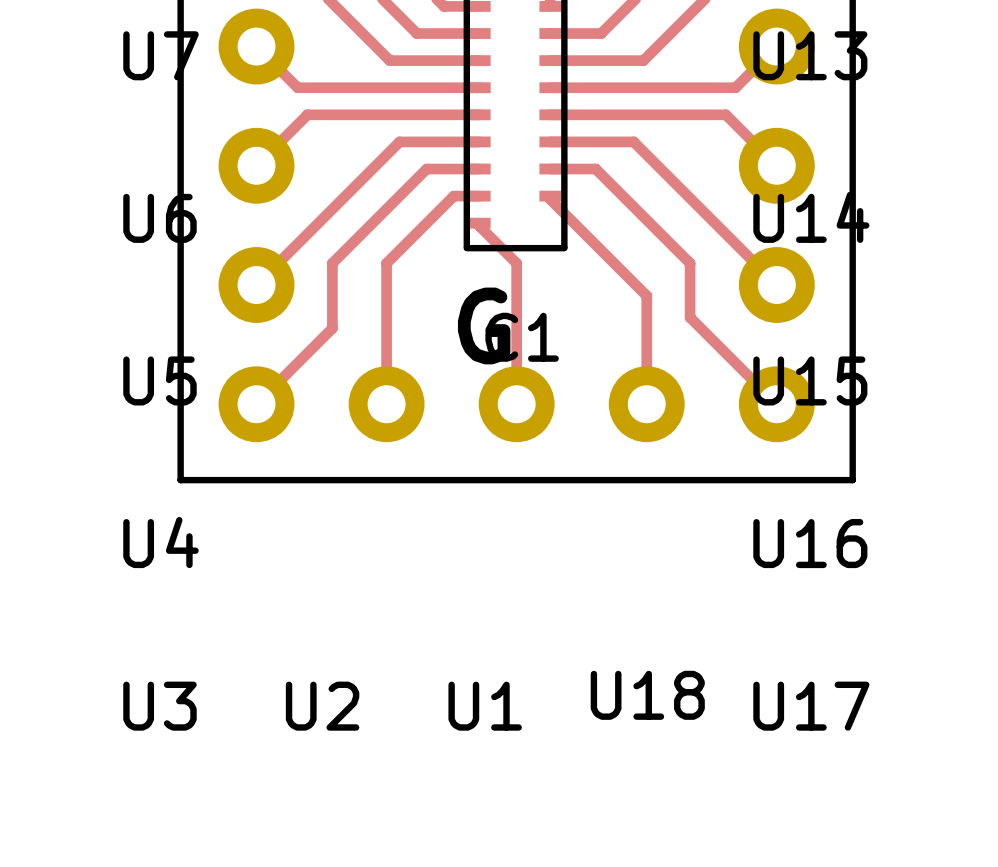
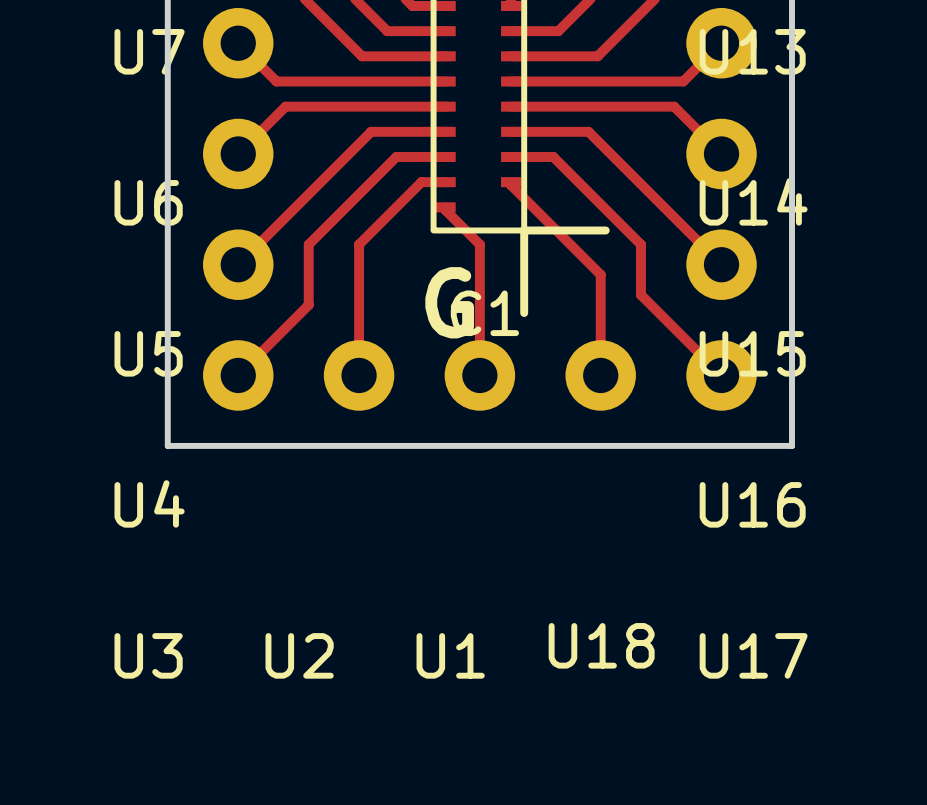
line: none -> (524, 229) (524, 313)
line: none -> (524, 230) (605, 230)

